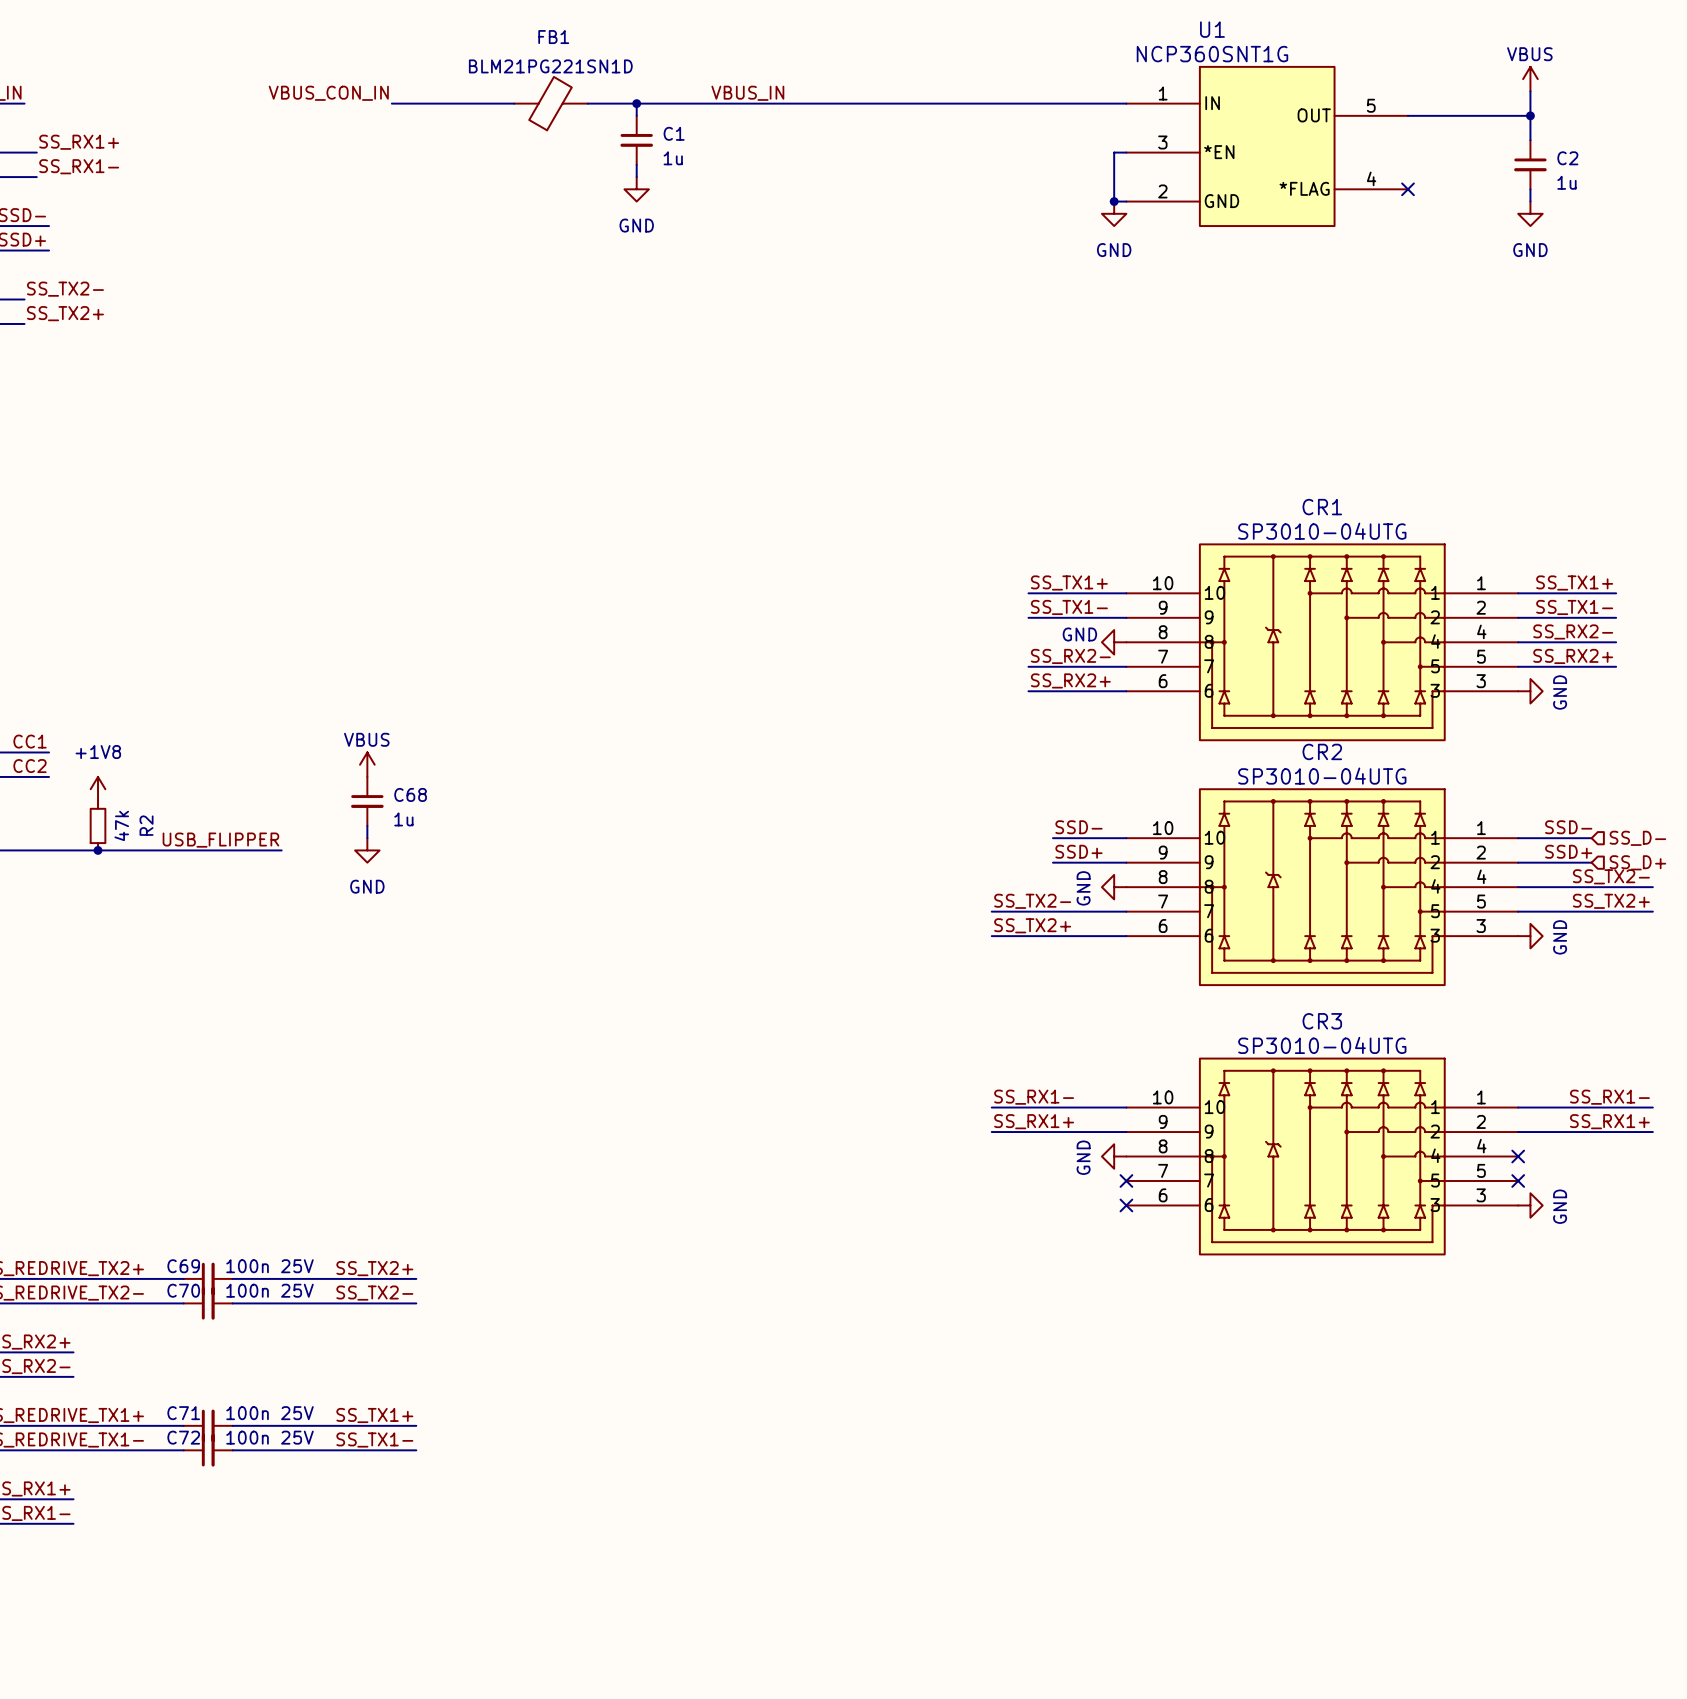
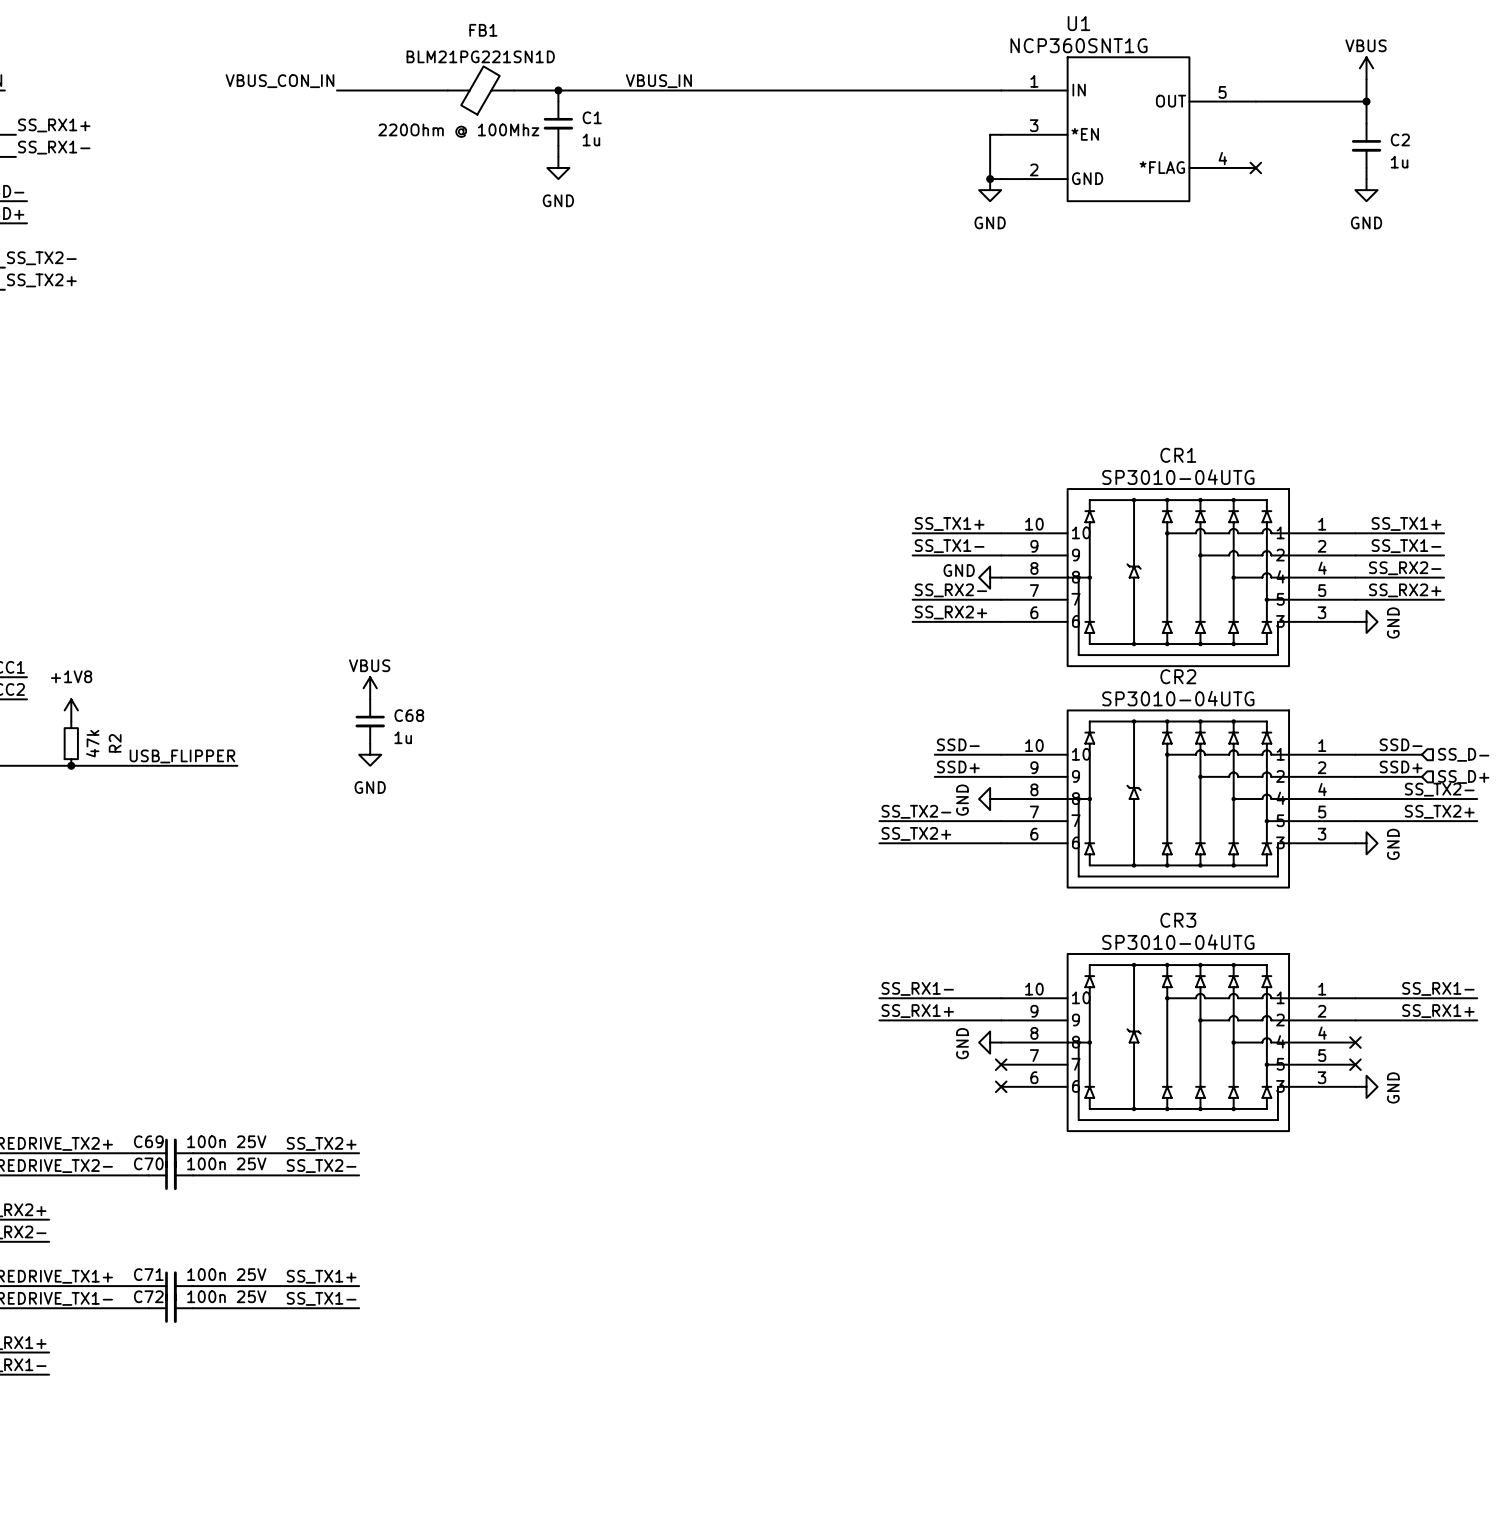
FB1 text: none -> 220Ohm @ 100Mhz (458, 130)
power symbol position: VBUS (367, 764) -> VBUS (370, 688)
C68 position: (367, 801) -> (370, 721)
wire: (367, 825) (367, 838) -> none
power symbol position: GND (367, 850) -> GND (370, 754)

